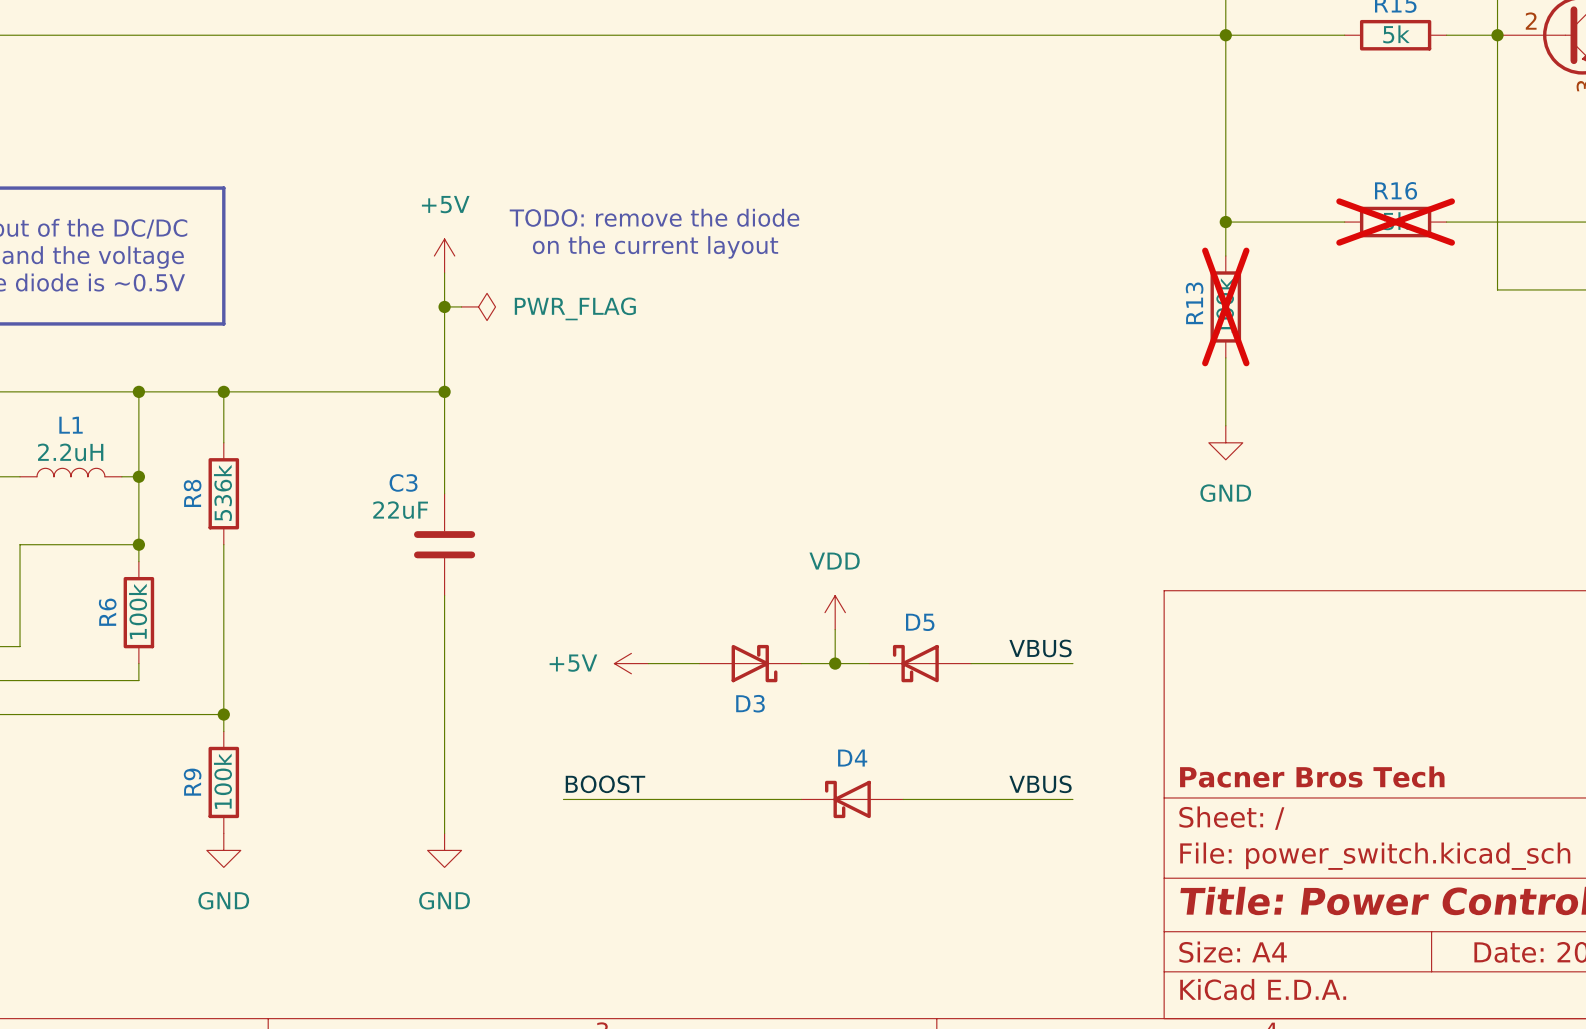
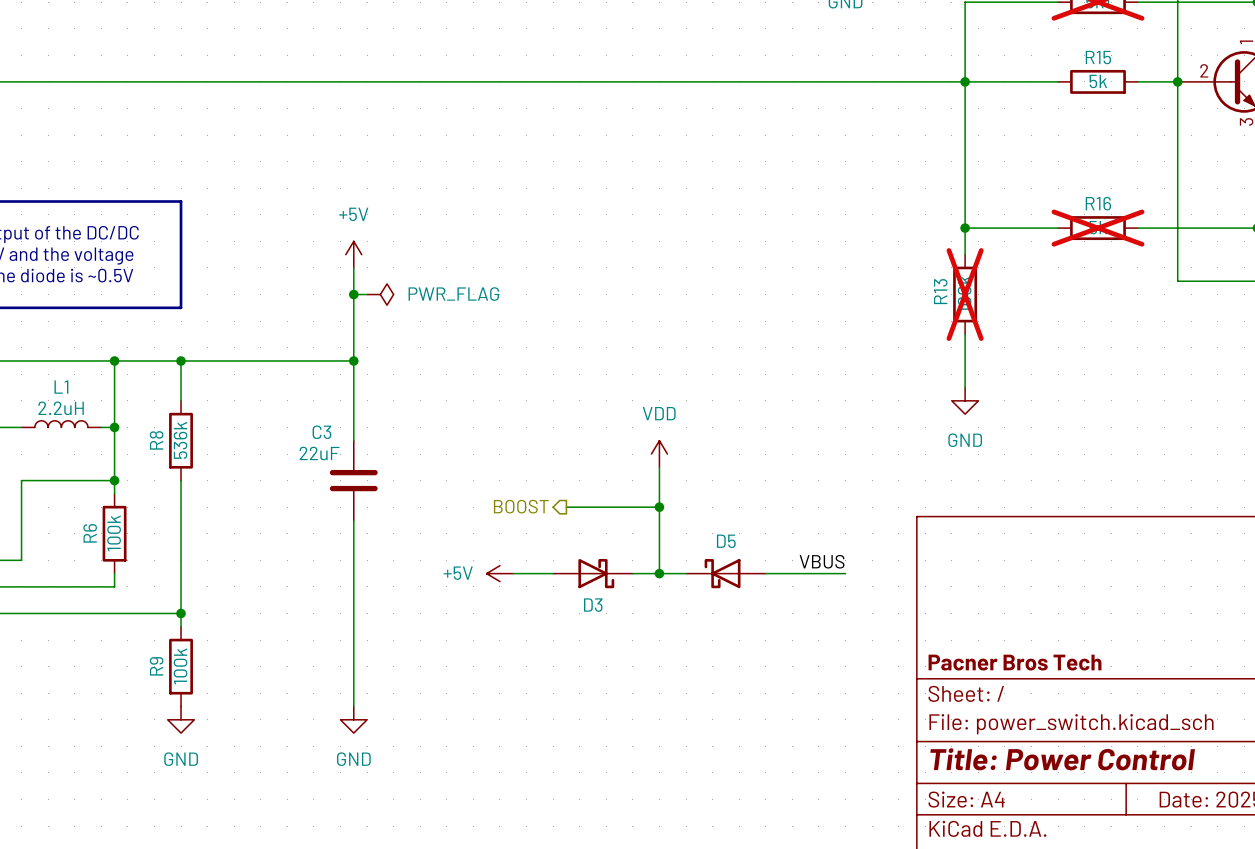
text: TODO: remove the diode (654, 217) -> none
text: on the current layout (655, 247) -> none
wire: none -> (659, 467) (659, 547)
hierarchical label: none -> BOOST (521, 506)
wire: none -> (566, 507) (659, 507)
junction: none -> (659, 507)
power symbol position: VDD (835, 612) -> VDD (659, 454)
label: BOOST (605, 784) -> none
label: VBUS (1040, 784) -> none
wire: (563, 799) (801, 799) -> none
D4: (852, 799) -> none
wire: (903, 799) (1072, 799) -> none

